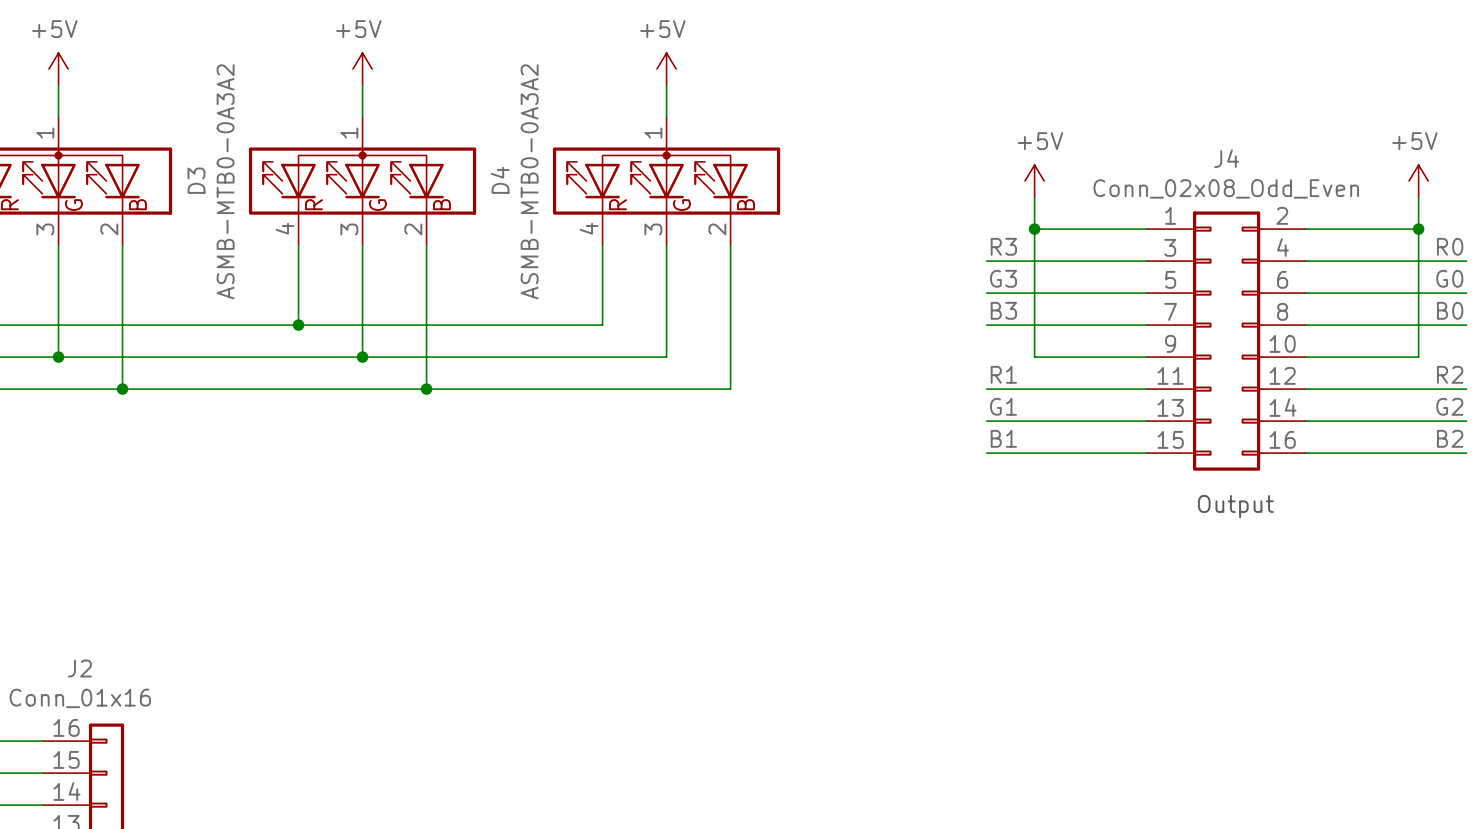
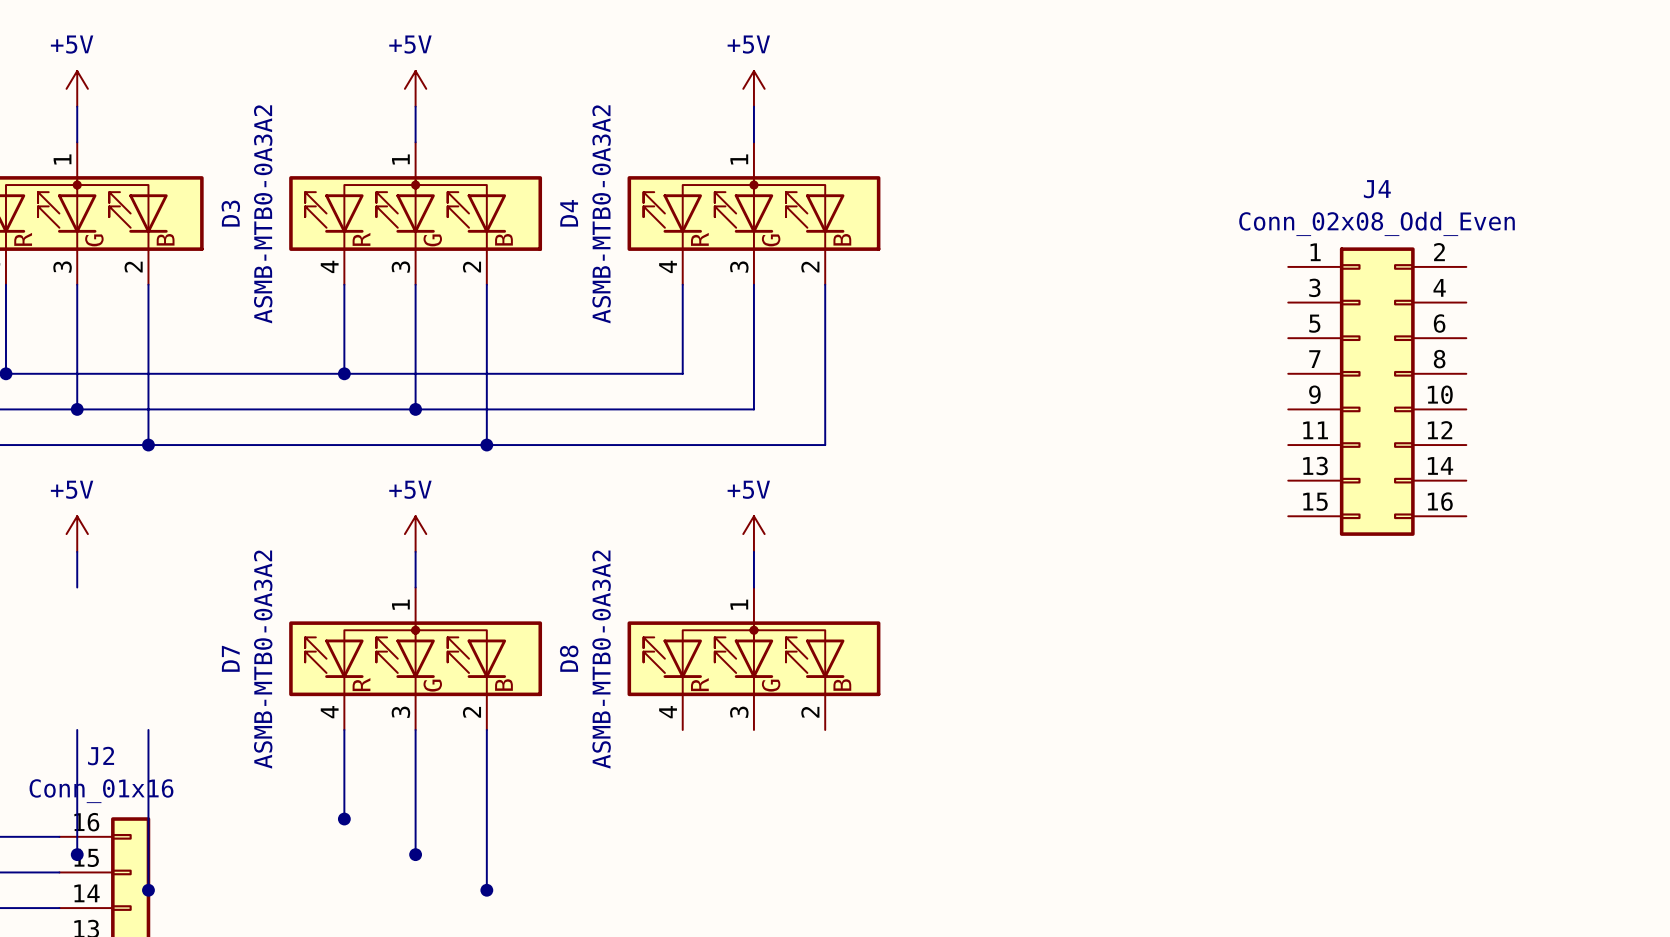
power symbol: +5V (1034, 181) -> none
power symbol: +5V (1418, 181) -> none
wire: (1034, 197) (1034, 357) (1146, 357) -> none
wire: (1418, 197) (1418, 357) (1306, 357) -> none
wire: (1034, 229) (1146, 229) -> none
junction: (1034, 229) -> none
wire: (1306, 229) (1418, 229) -> none
junction: (1418, 229) -> none
label: R3 (1003, 246) -> none
label: R0 (1450, 246) -> none
wire: (986, 261) (1146, 261) -> none
wire: (1306, 261) (1466, 261) -> none
label: G3 (1003, 278) -> none
label: G0 (1449, 278) -> none
wire: (986, 293) (1146, 293) -> none
wire: (1306, 293) (1466, 293) -> none
label: B3 (1003, 310) -> none
label: B0 (1450, 310) -> none
wire: (986, 325) (1146, 325) -> none
wire: (1306, 325) (1466, 325) -> none
label: R1 (1003, 374) -> none
label: R2 (1450, 374) -> none
wire: (986, 389) (1146, 389) -> none
wire: (1306, 389) (1466, 389) -> none
label: G1 (1003, 406) -> none
label: G2 (1449, 406) -> none
wire: (986, 421) (1146, 421) -> none
wire: (1306, 421) (1466, 421) -> none
label: B1 (1003, 438) -> none
label: B2 (1450, 438) -> none
wire: (986, 453) (1146, 453) -> none
wire: (1306, 453) (1466, 453) -> none
power symbol: none -> +5V (77, 534)
power symbol: none -> +5V (415, 534)
power symbol: none -> +5V (753, 534)
wire: none -> (77, 551) (77, 587)
wire: none -> (415, 551) (415, 587)
wire: none -> (753, 551) (753, 587)
text: Output (1235, 506) -> none
D7: none -> ASMB-MTB0-0A3A2 (415, 658)
D8: none -> ASMB-MTB0-0A3A2 (753, 658)
wire: none -> (77, 729) (77, 854)
wire: none -> (148, 729) (148, 890)
wire: none -> (344, 729) (344, 819)
wire: none -> (415, 729) (415, 854)
wire: none -> (486, 729) (486, 890)
junction: none -> (344, 819)
junction: none -> (77, 854)
junction: none -> (415, 854)
junction: none -> (148, 890)
junction: none -> (486, 890)

